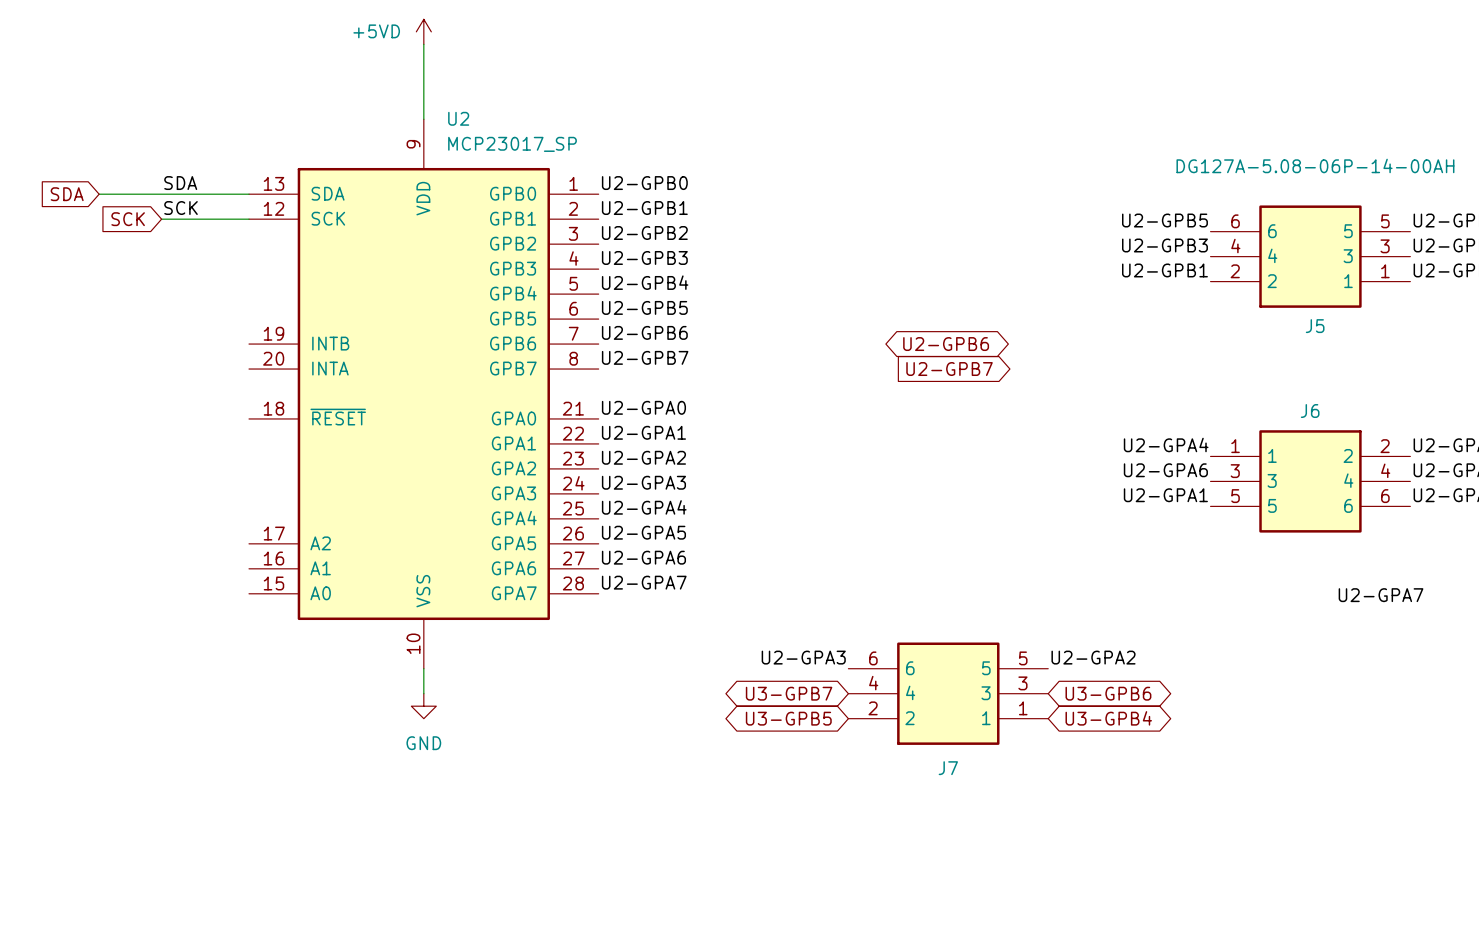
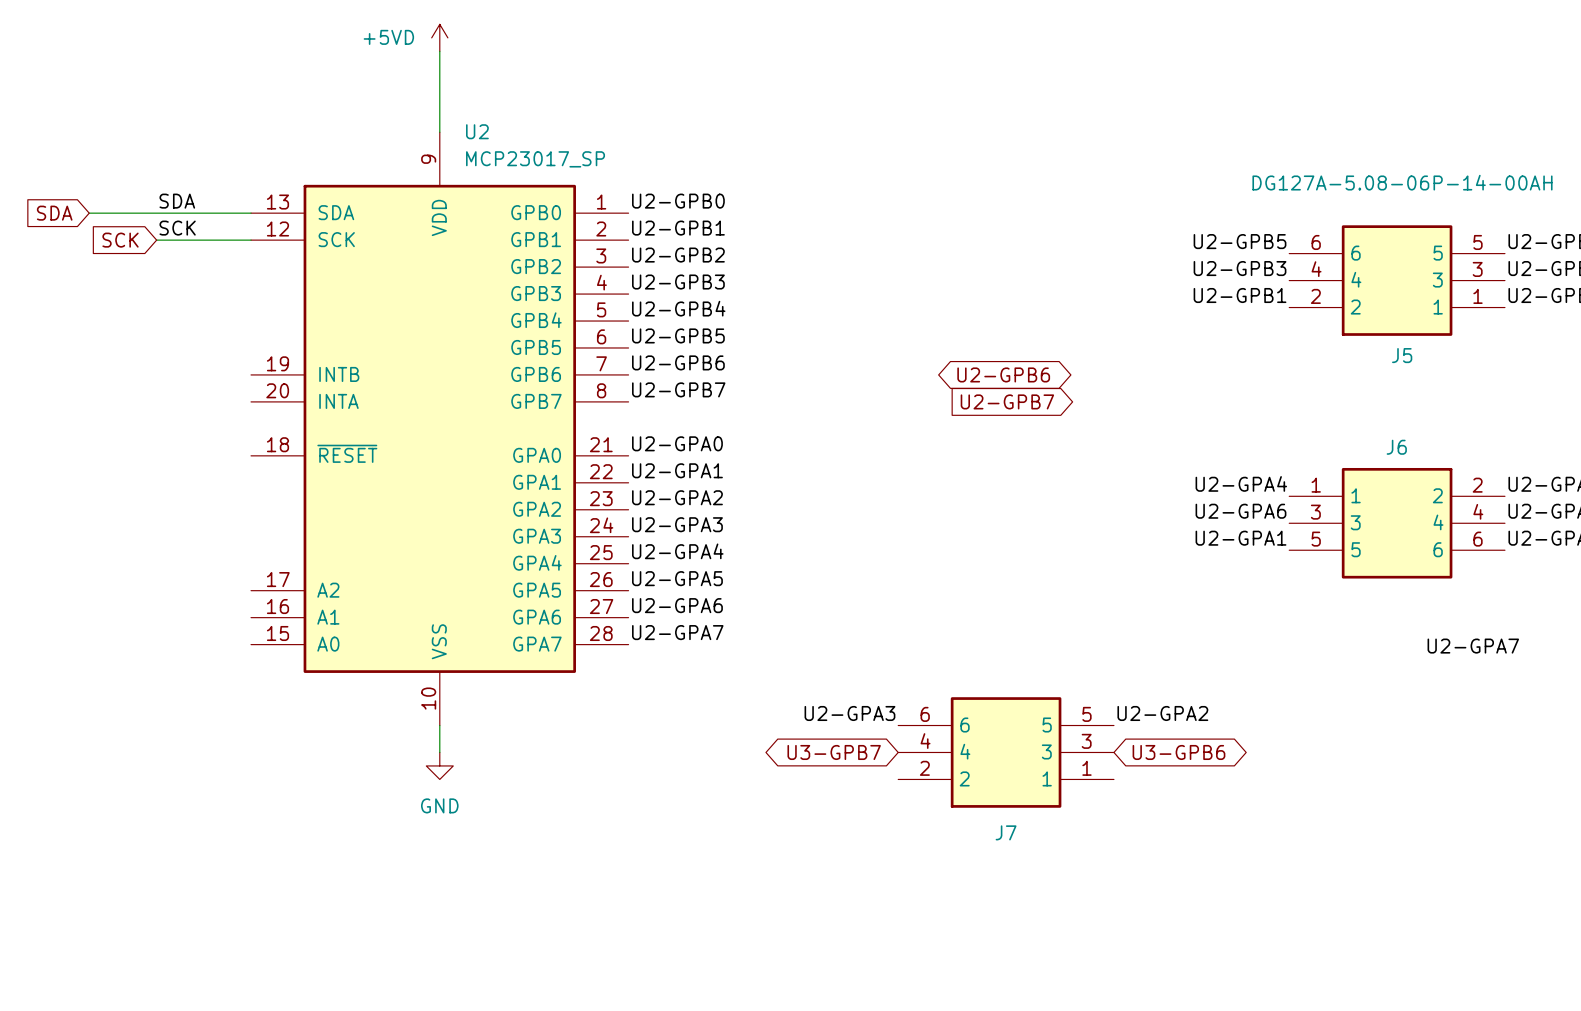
global label: U3-GPB5 (788, 718) -> none
global label: U3-GPB4 (1108, 718) -> none

